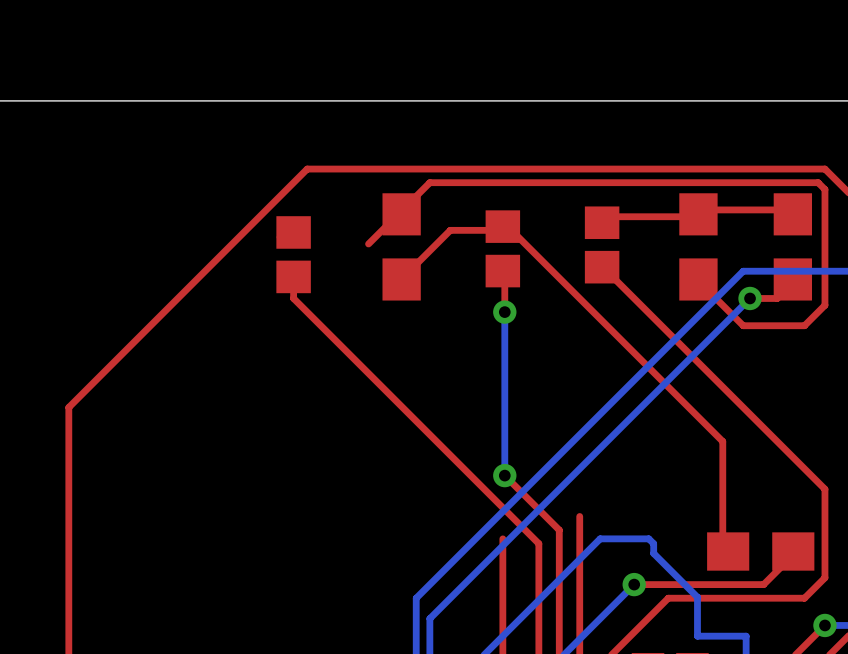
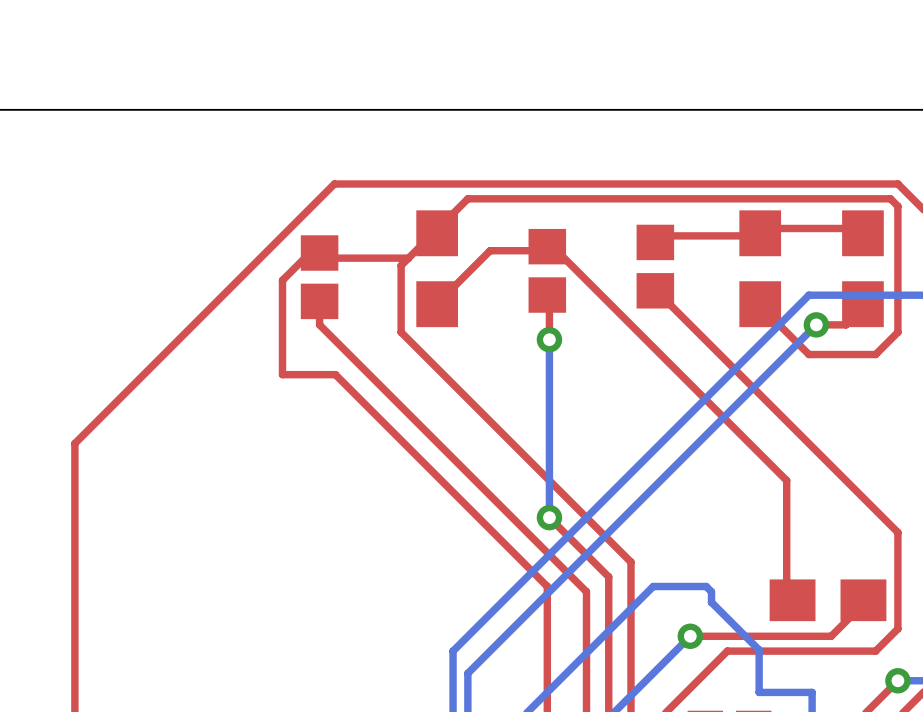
top track: none -> (304, 258) (282, 280) (282, 374) (335, 374) (547, 586)
top track: none -> (408, 258) (319, 258)
top track: none -> (401, 265) (401, 332) (630, 562)

